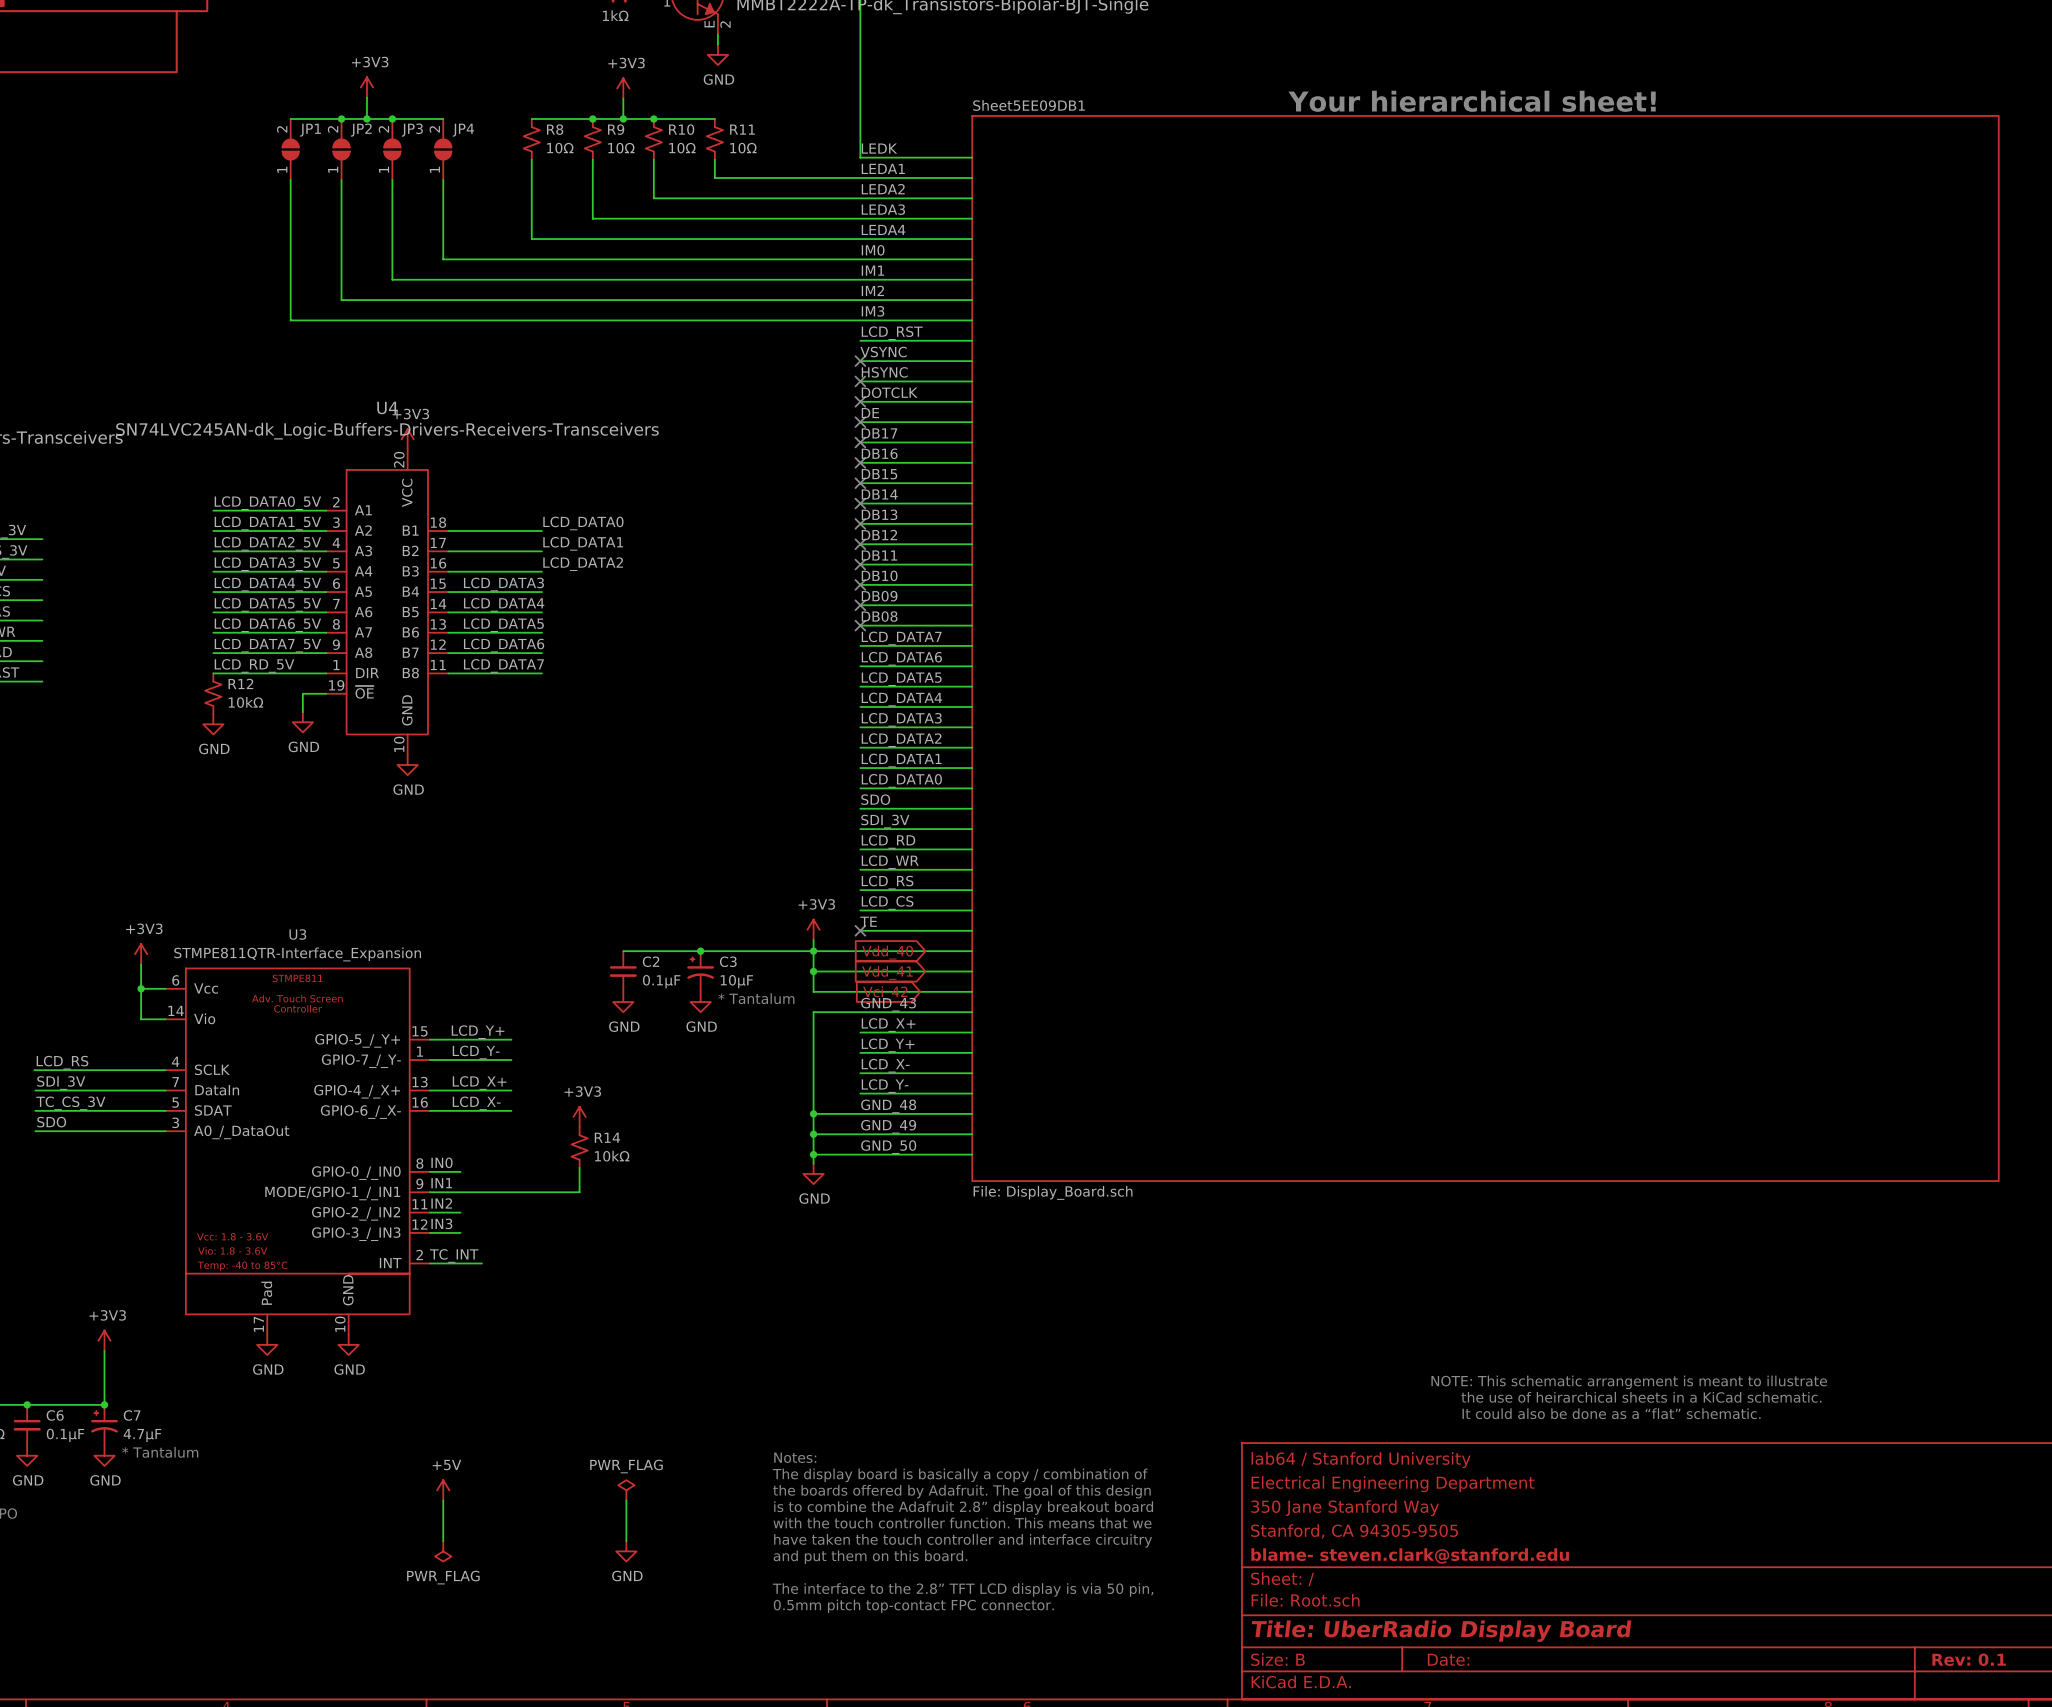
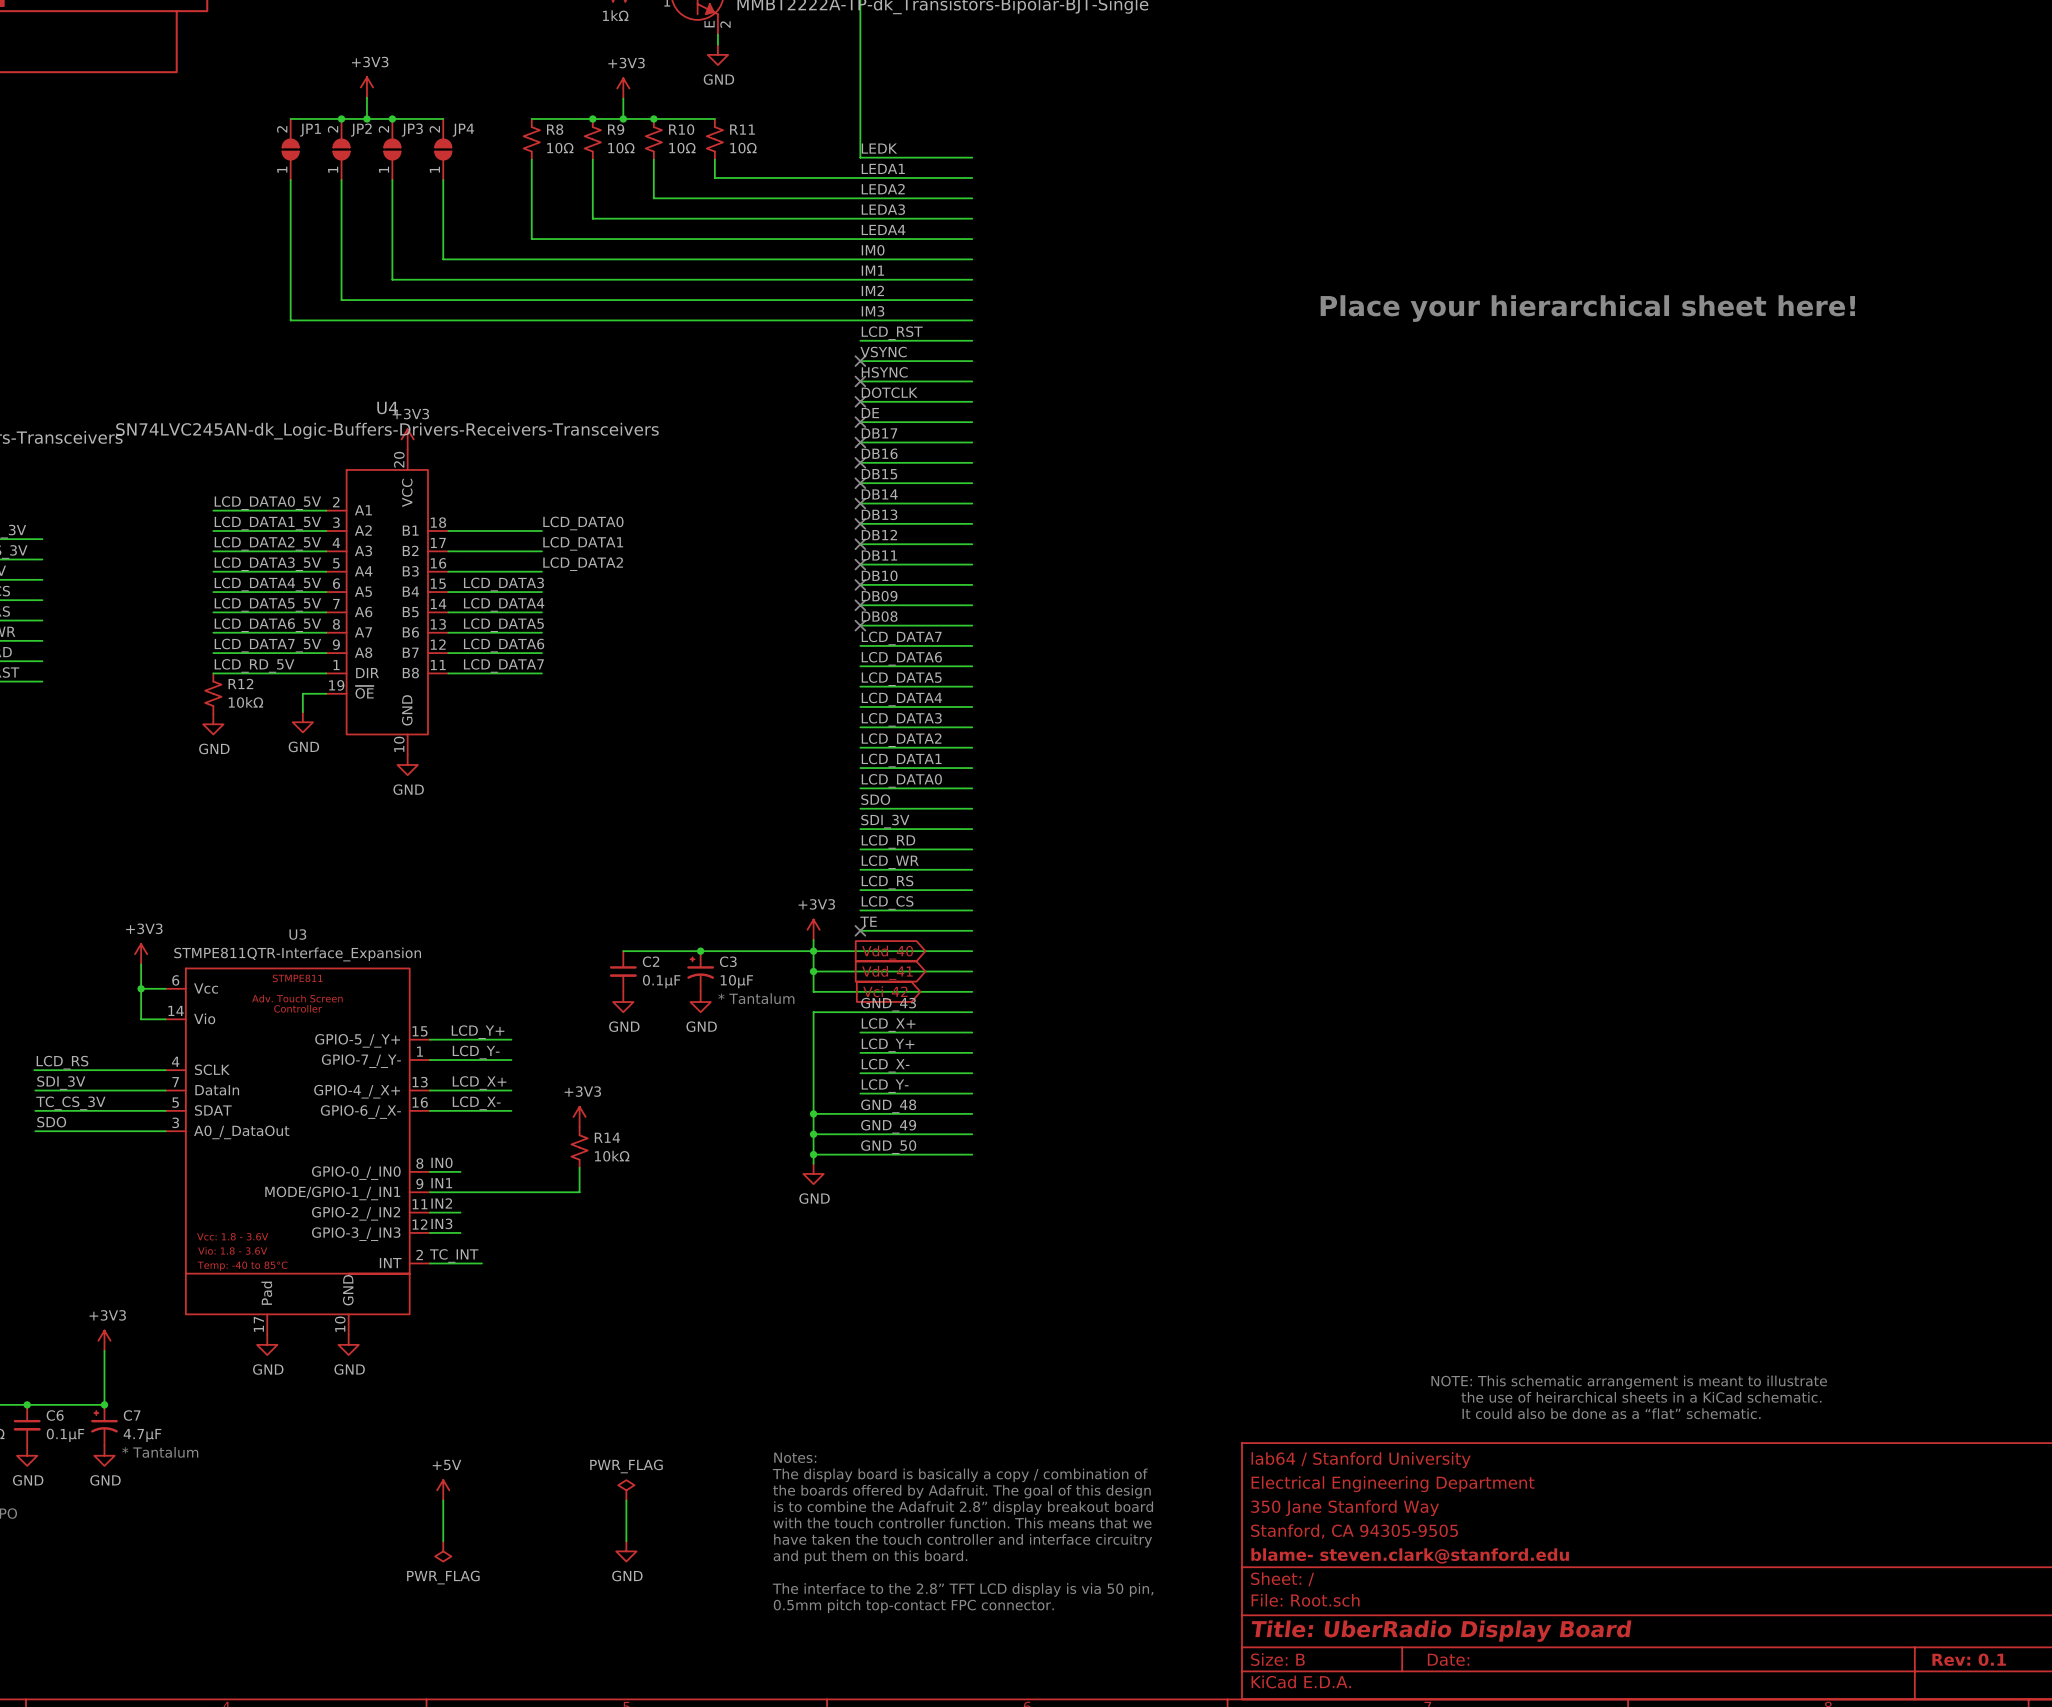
text: Your hierarchical sheet! (1472, 101) -> none
text: none -> Place your hierarchical sheet here! (1587, 308)
sheet Sheet5EE09DB1: File: Display_Board.sch (1485, 648) -> none

